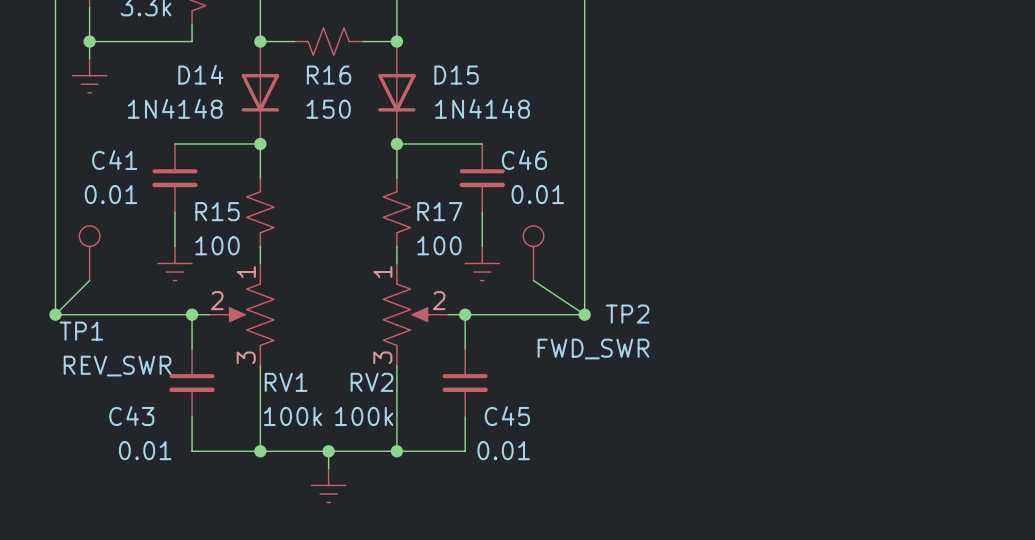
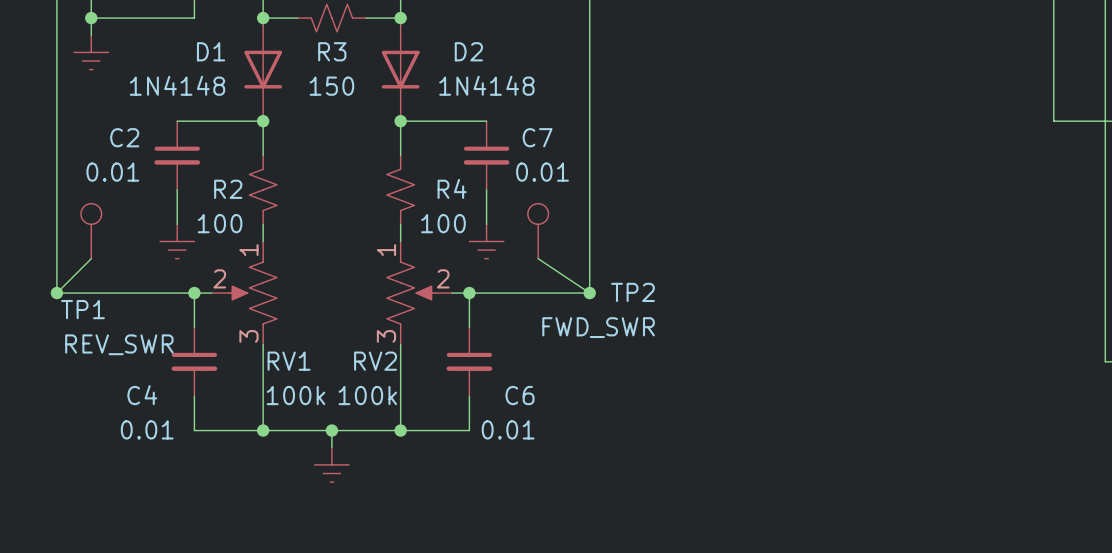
D14 name: D14 (200, 74) -> D1 (211, 51)
R16 name: R16 (329, 75) -> R3 (332, 51)
D15 name: D15 (456, 75) -> D2 (468, 51)
C41 name: C41 (114, 160) -> C2 (124, 137)
C46 name: C46 (524, 160) -> C7 (537, 137)
R15 name: R15 (217, 211) -> R2 (228, 189)
R17 name: R17 (439, 211) -> R4 (452, 188)
C43 name: C43 (131, 416) -> C4 (142, 395)
C45 name: C45 (507, 416) -> C6 (520, 395)

